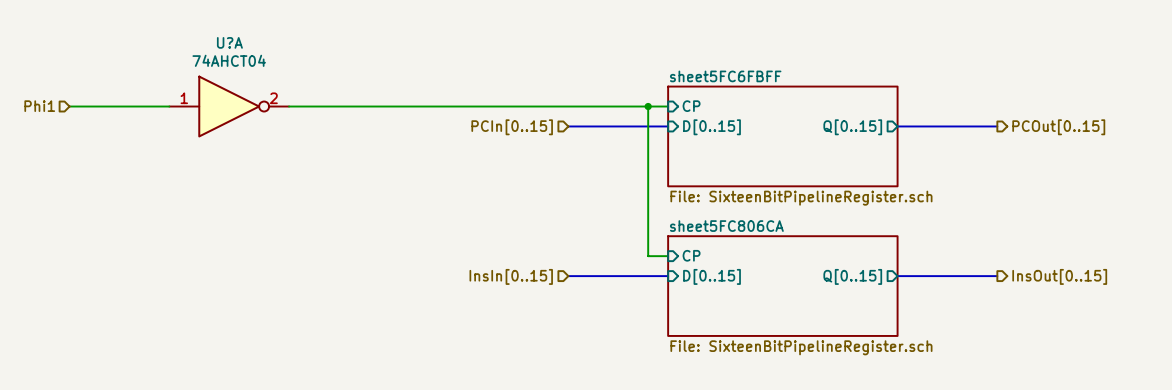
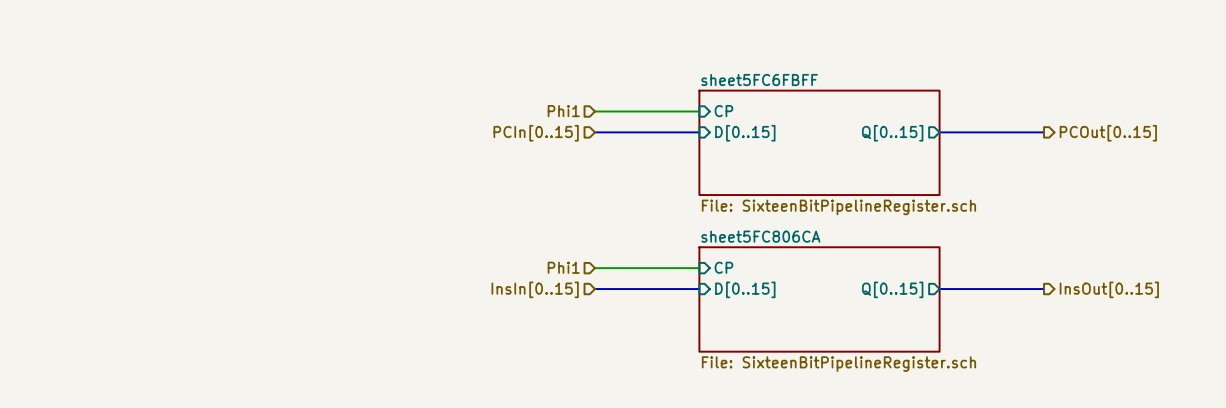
hierarchical label: Phi1 (39, 106) -> none
wire: (69, 106) (169, 106) -> none
U?A: 74AHCT04 (229, 106) -> none
wire: (289, 106) (568, 106) -> none
hierarchical label: none -> Phi1 (563, 111)
wire: (648, 106) (648, 256) -> (594, 268) (678, 268)
junction: (648, 106) -> none
hierarchical label: none -> Phi1 (563, 267)

